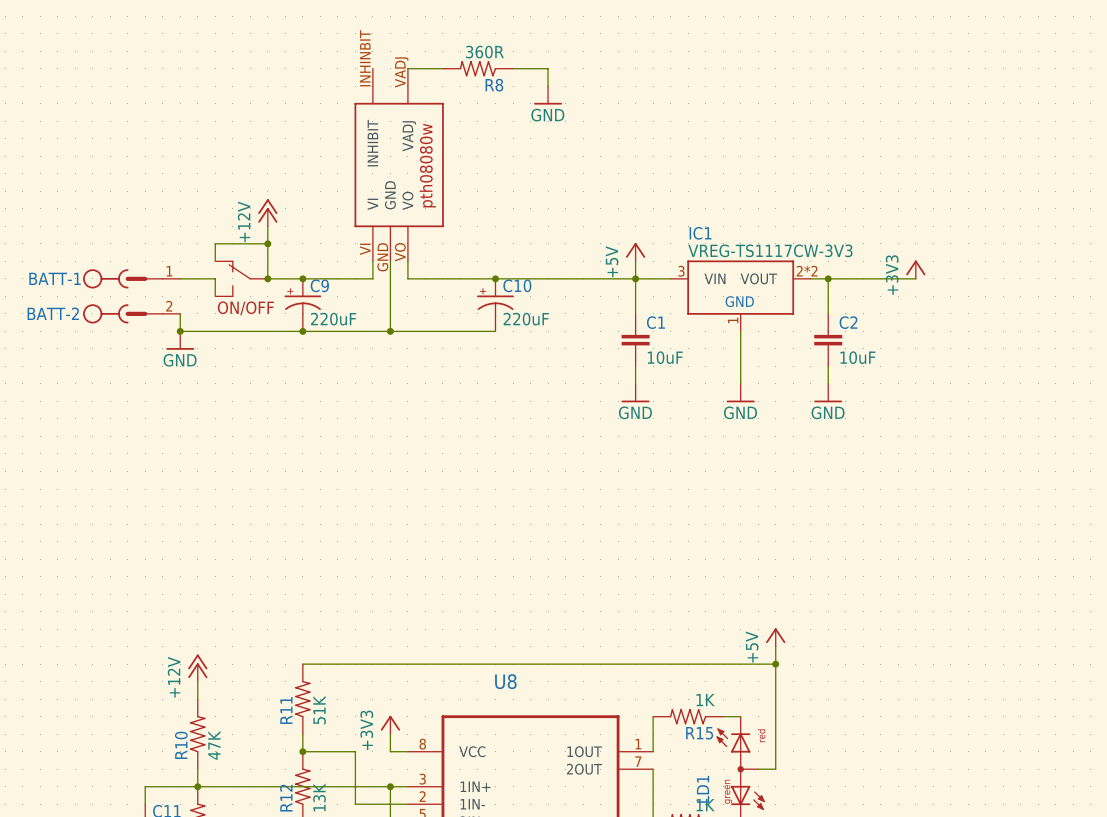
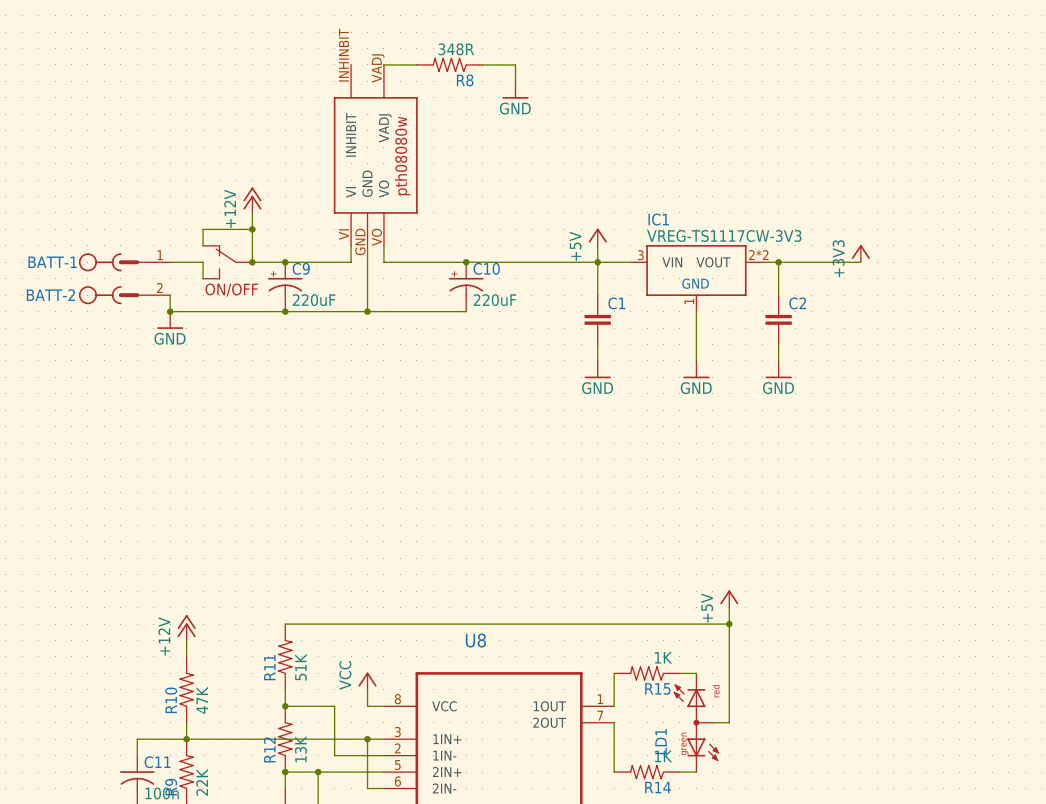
R8 value: 360R (484, 52) -> 348R (456, 49)
C1 value: 10uF (665, 357) -> none
C2 value: 10uF (857, 357) -> none
power symbol: +3V3 (390, 725) -> VCC (367, 681)

